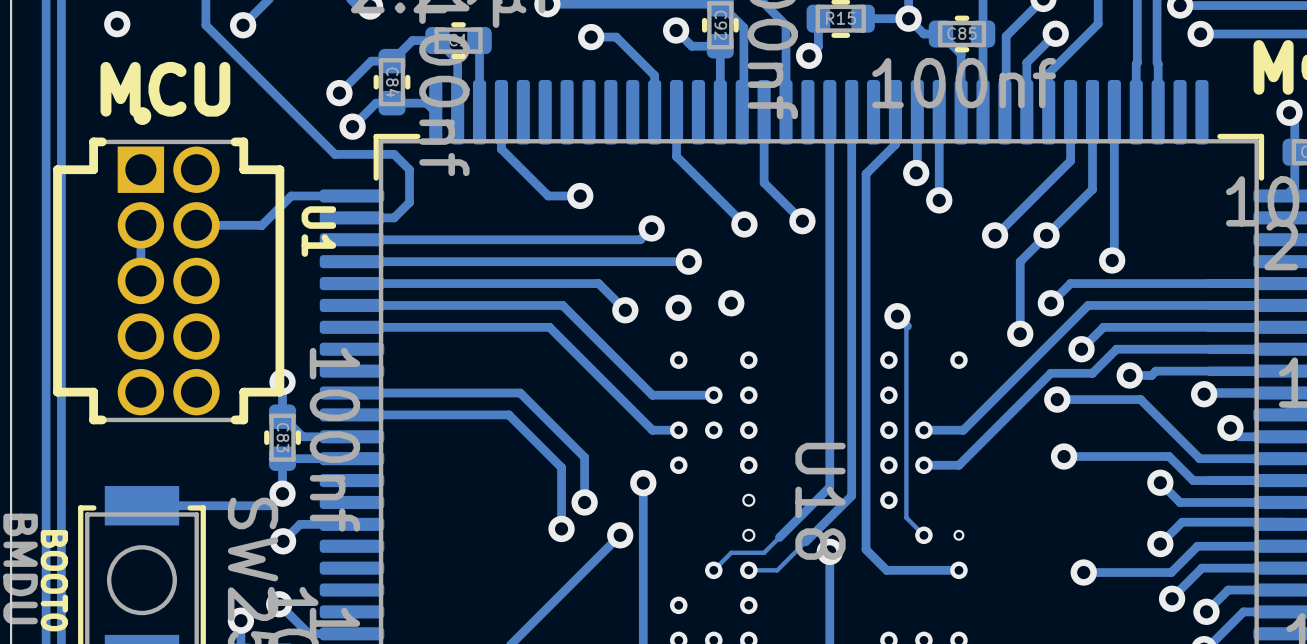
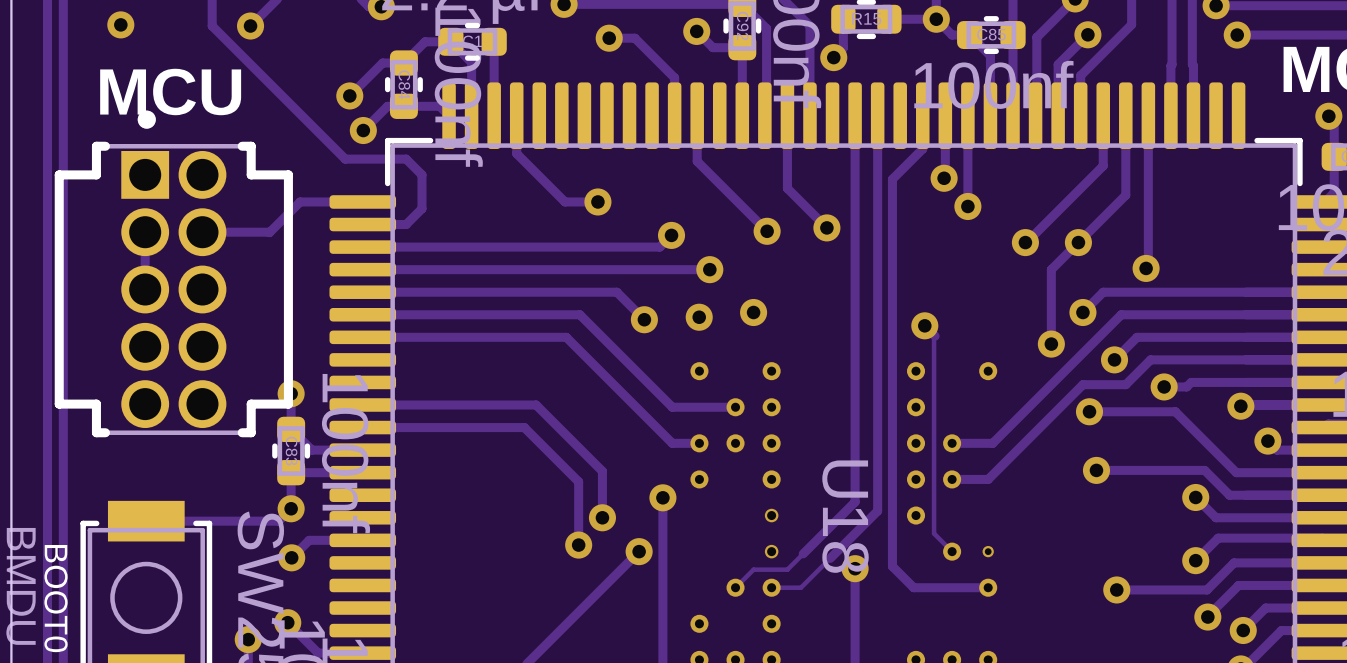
U1 name: U1 (318, 231) -> none

